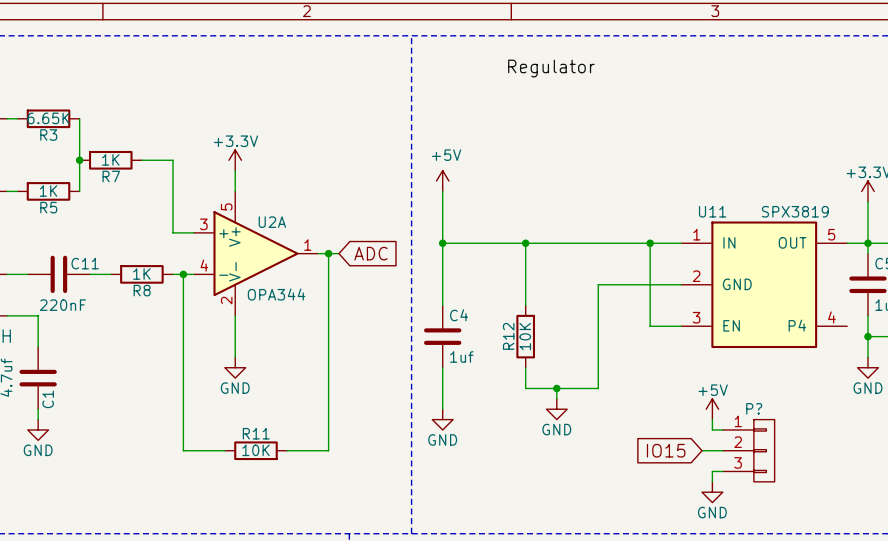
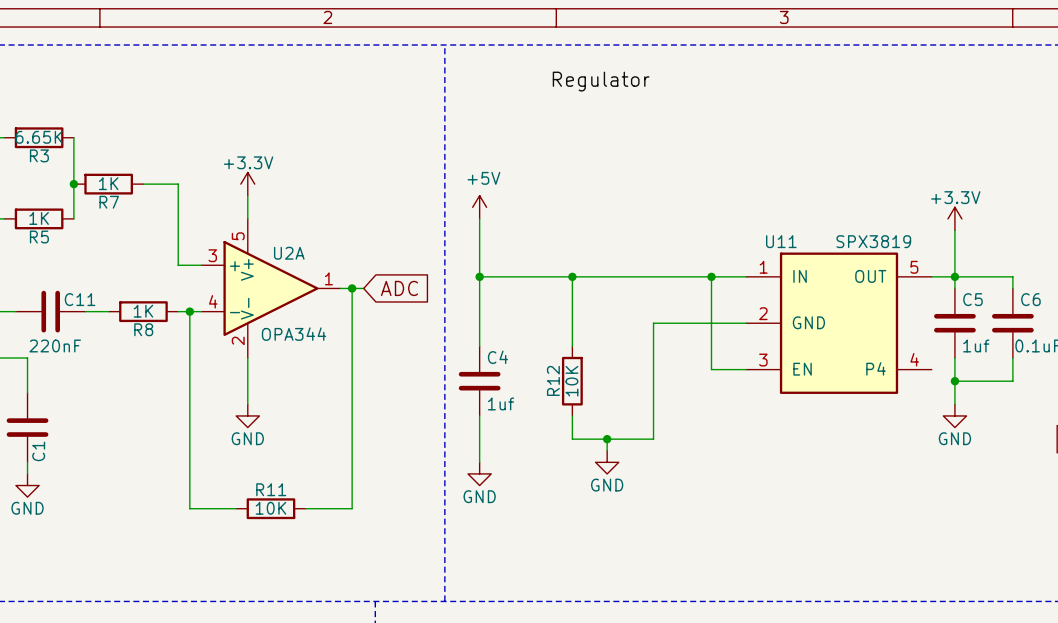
power symbol: +5V (712, 409) -> none
wire: (712, 419) (712, 429) (722, 429) -> none
global label: IO15 (666, 450) -> none
wire: (702, 450) (722, 450) -> none
P?: (748, 450) -> none
wire: (722, 471) (712, 471) (712, 481) -> none
power symbol: GND (712, 492) -> none

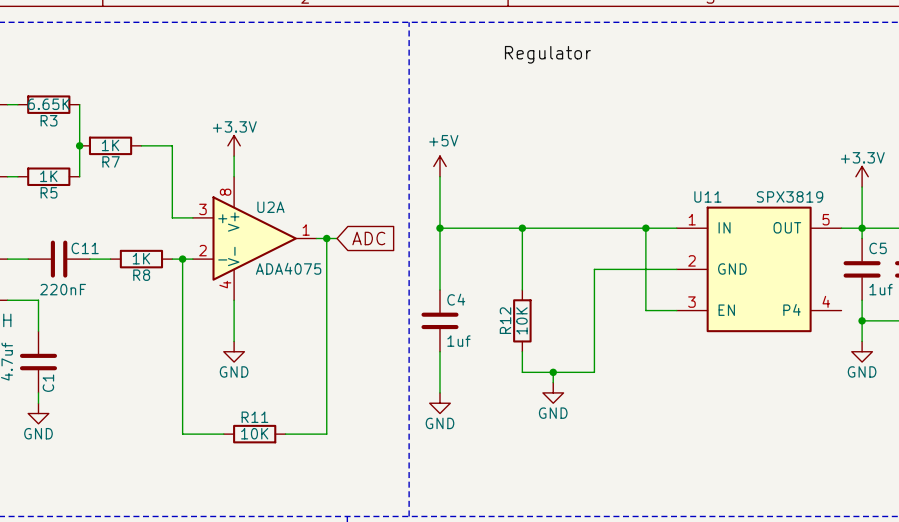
U2A pin number: 5 (238, 236) -> 8 (225, 192)
U2A pin number: 4 (213, 301) -> 2 (202, 250)
U2A value: OPA344 (293, 334) -> ADA4075 (288, 268)
U2A pin number: 2 (238, 340) -> 4 (225, 284)

